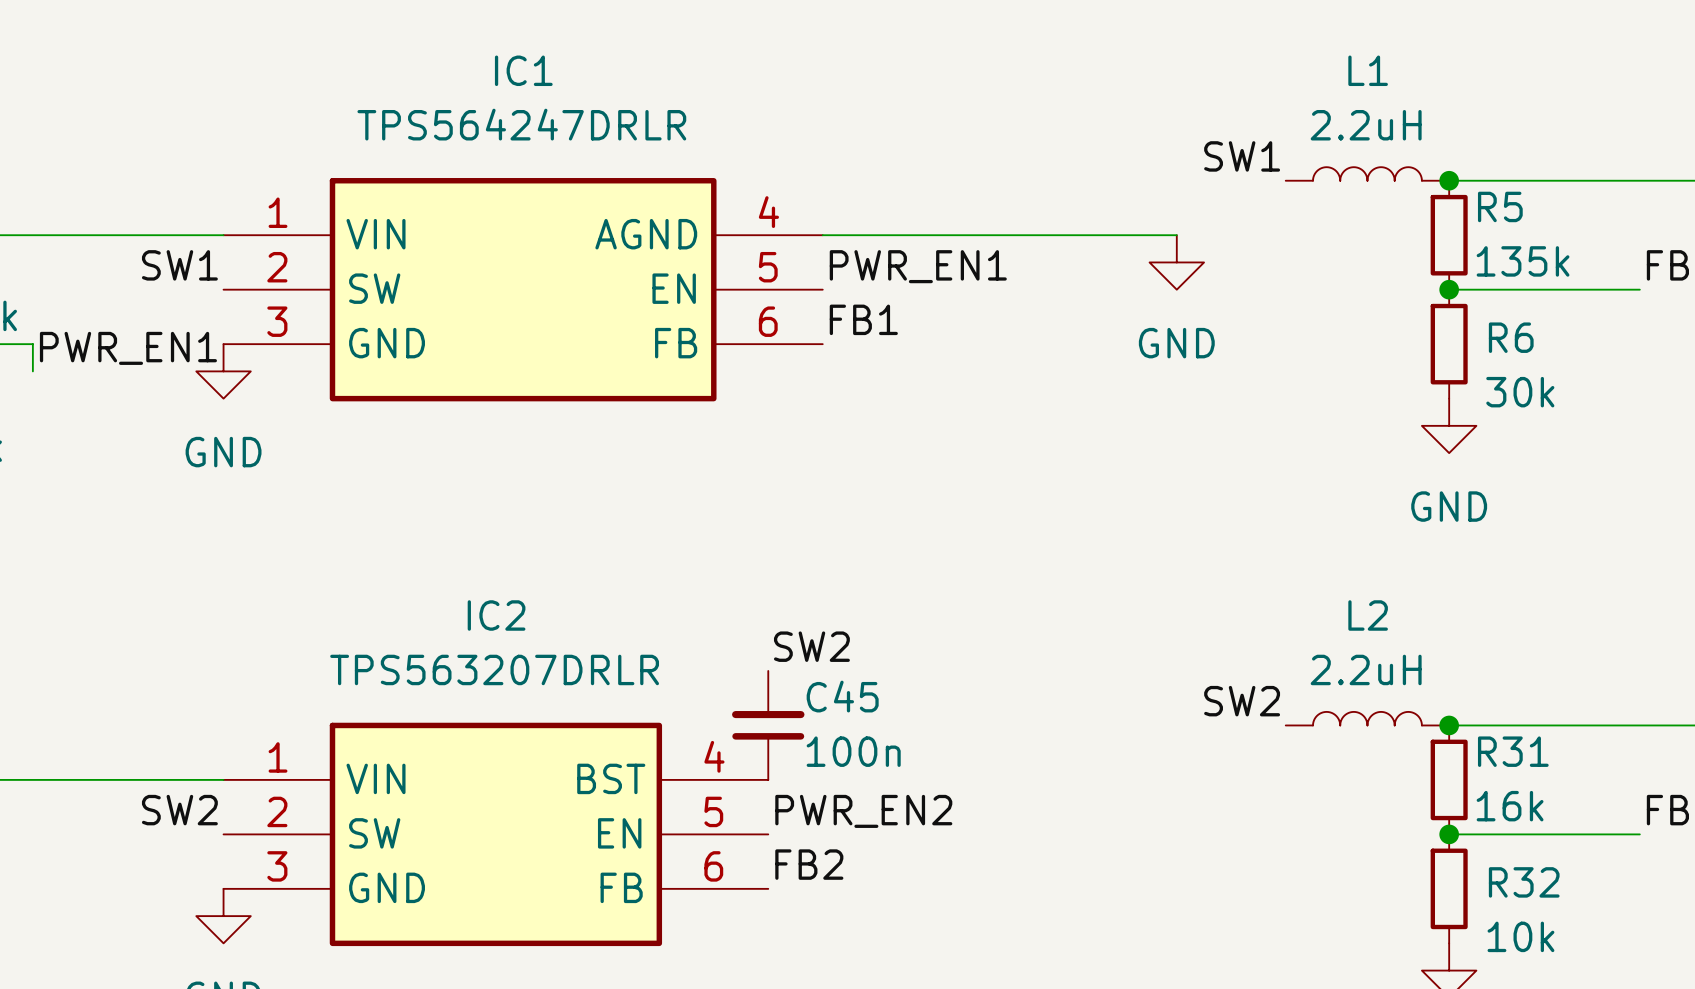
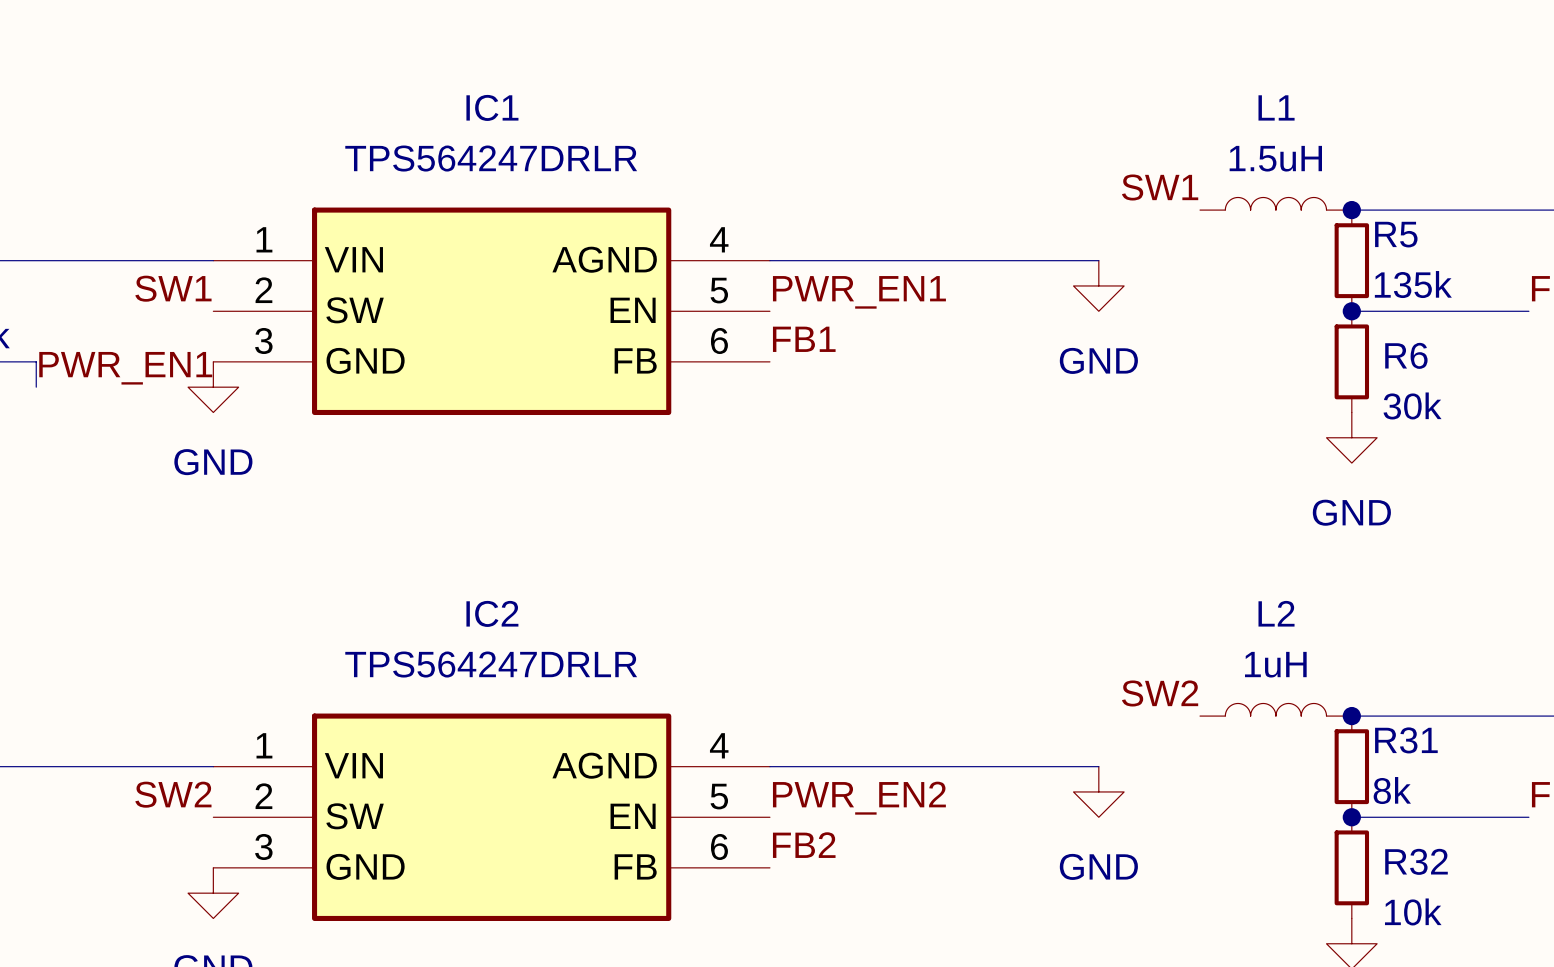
L1 value: 2.2uH (1366, 125) -> 1.5uH (1275, 158)
label: SW2 (811, 646) -> none
IC2 value: TPS563207DRLR (494, 669) -> TPS564247DRLR (491, 664)
L2 value: 2.2uH (1366, 669) -> 1uH (1275, 664)
IC2 symbol: [223, 722, 769, 947] -> [213, 713, 770, 921]
C45: 100n (768, 725) -> none
wire: none -> (769, 766) (1098, 766)
R31 value: 16k (1510, 806) -> 8k (1392, 790)
power symbol: none -> GND (1098, 791)
label position: PWR_EN2 (863, 811) -> PWR_EN2 (859, 798)
label position: FB2 (809, 864) -> FB2 (804, 845)

